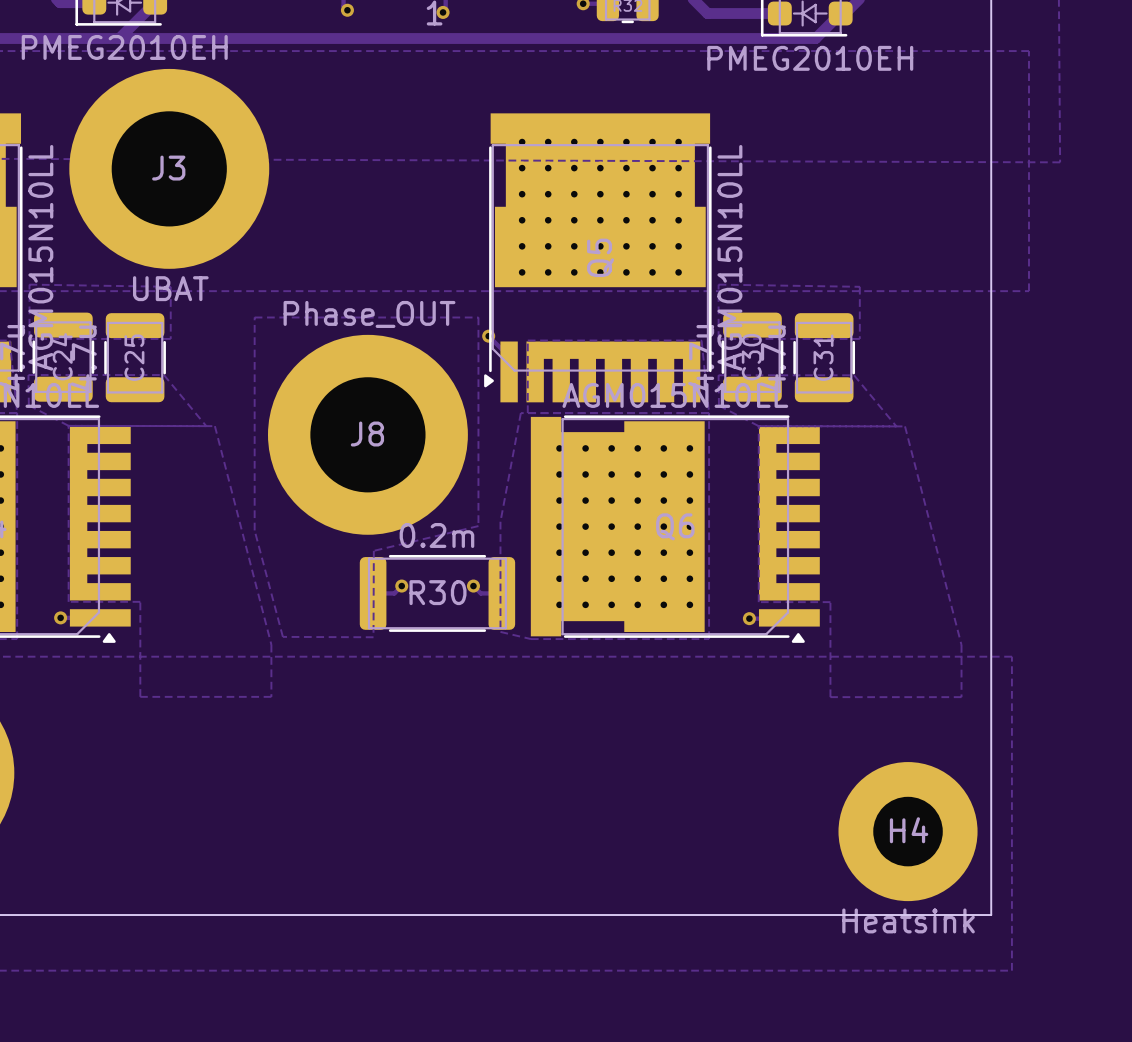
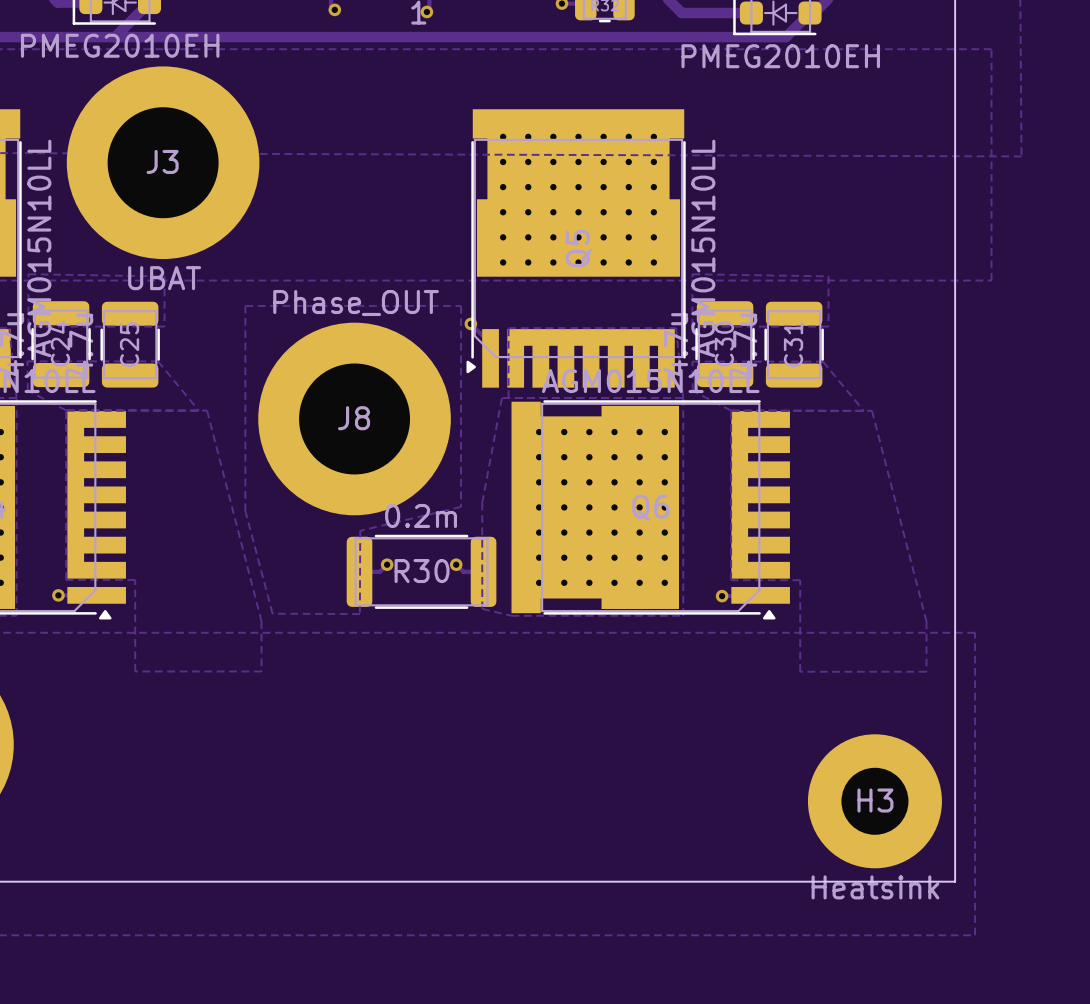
H4 name: H4 (909, 830) -> H3 (875, 800)

